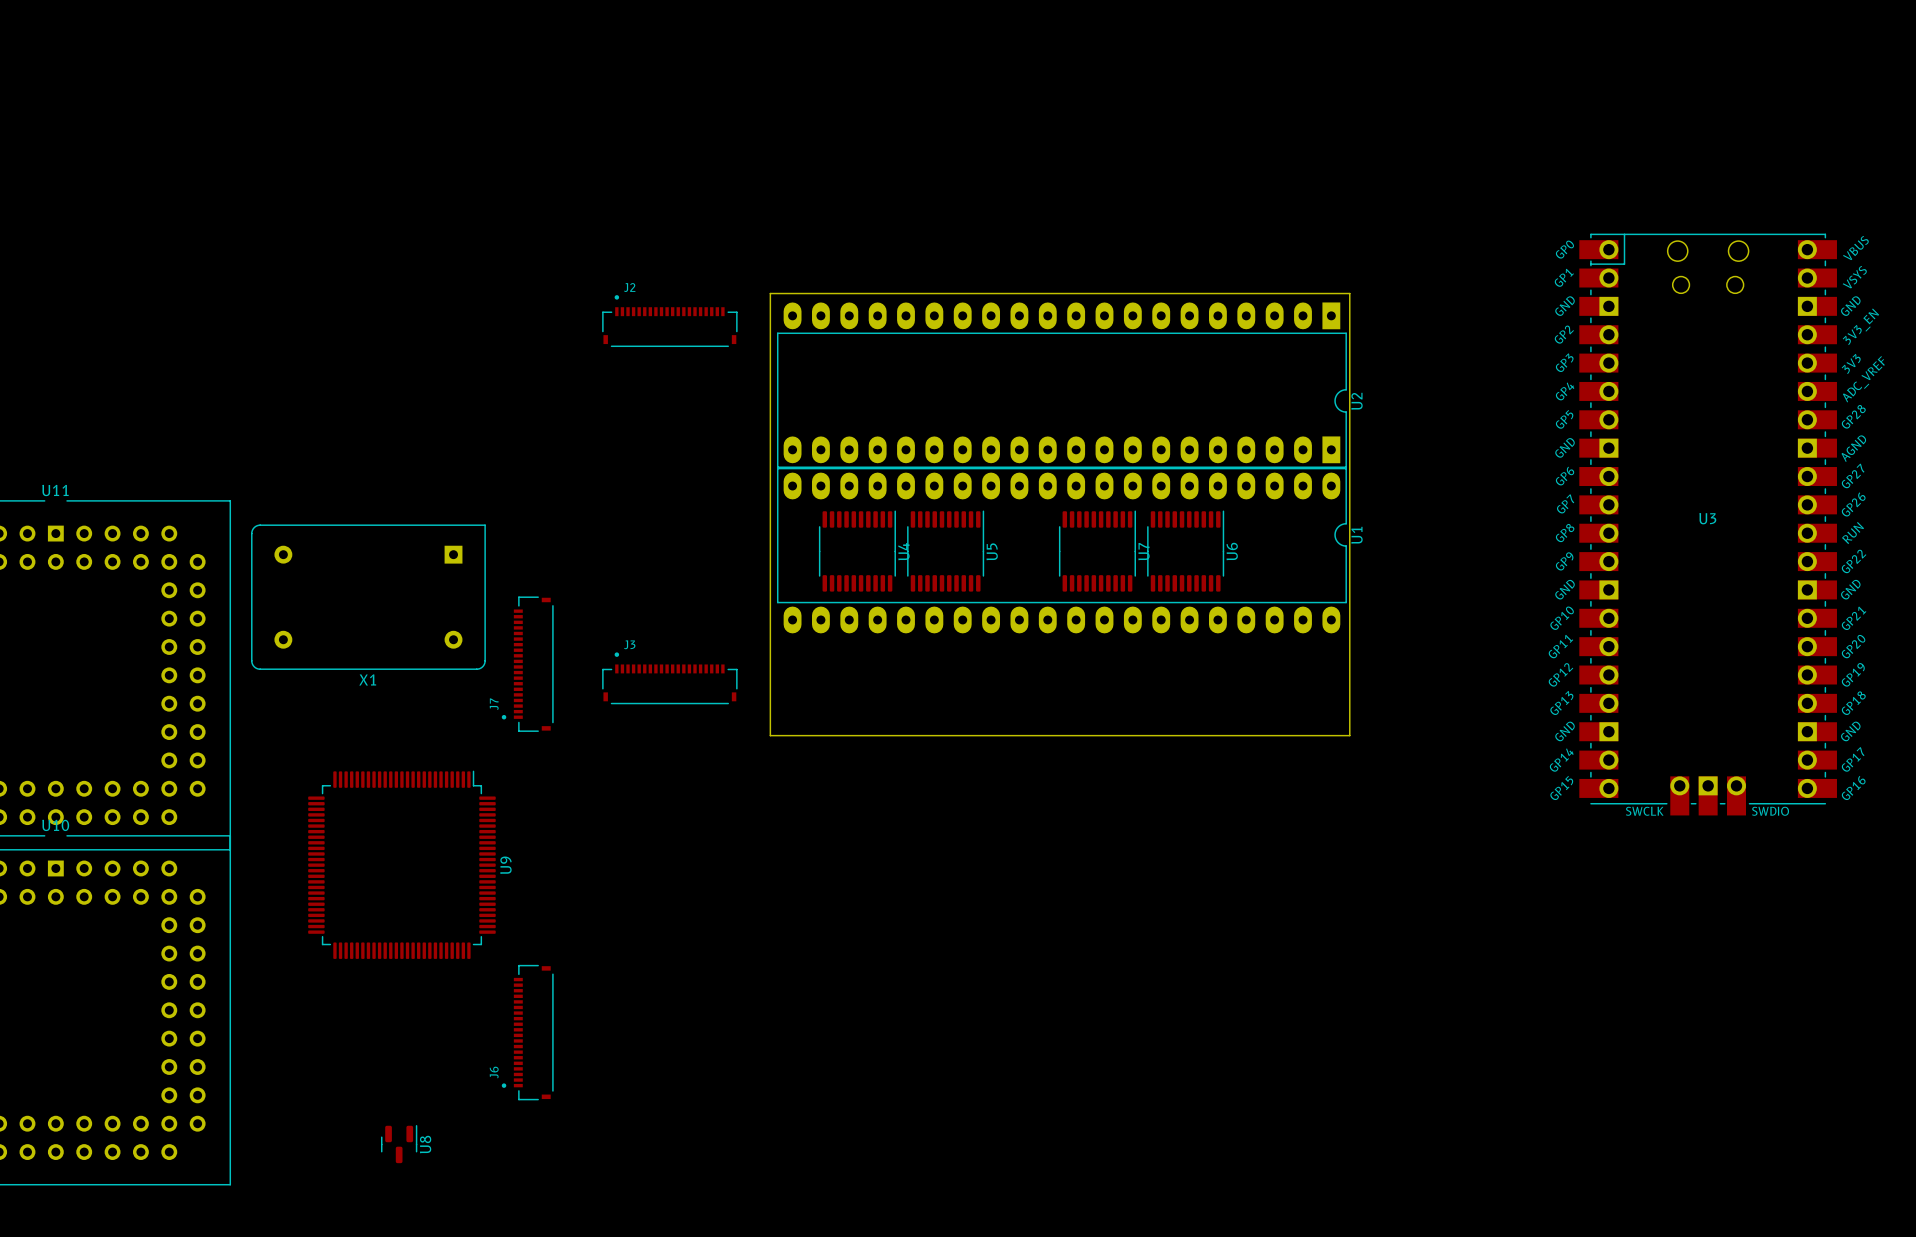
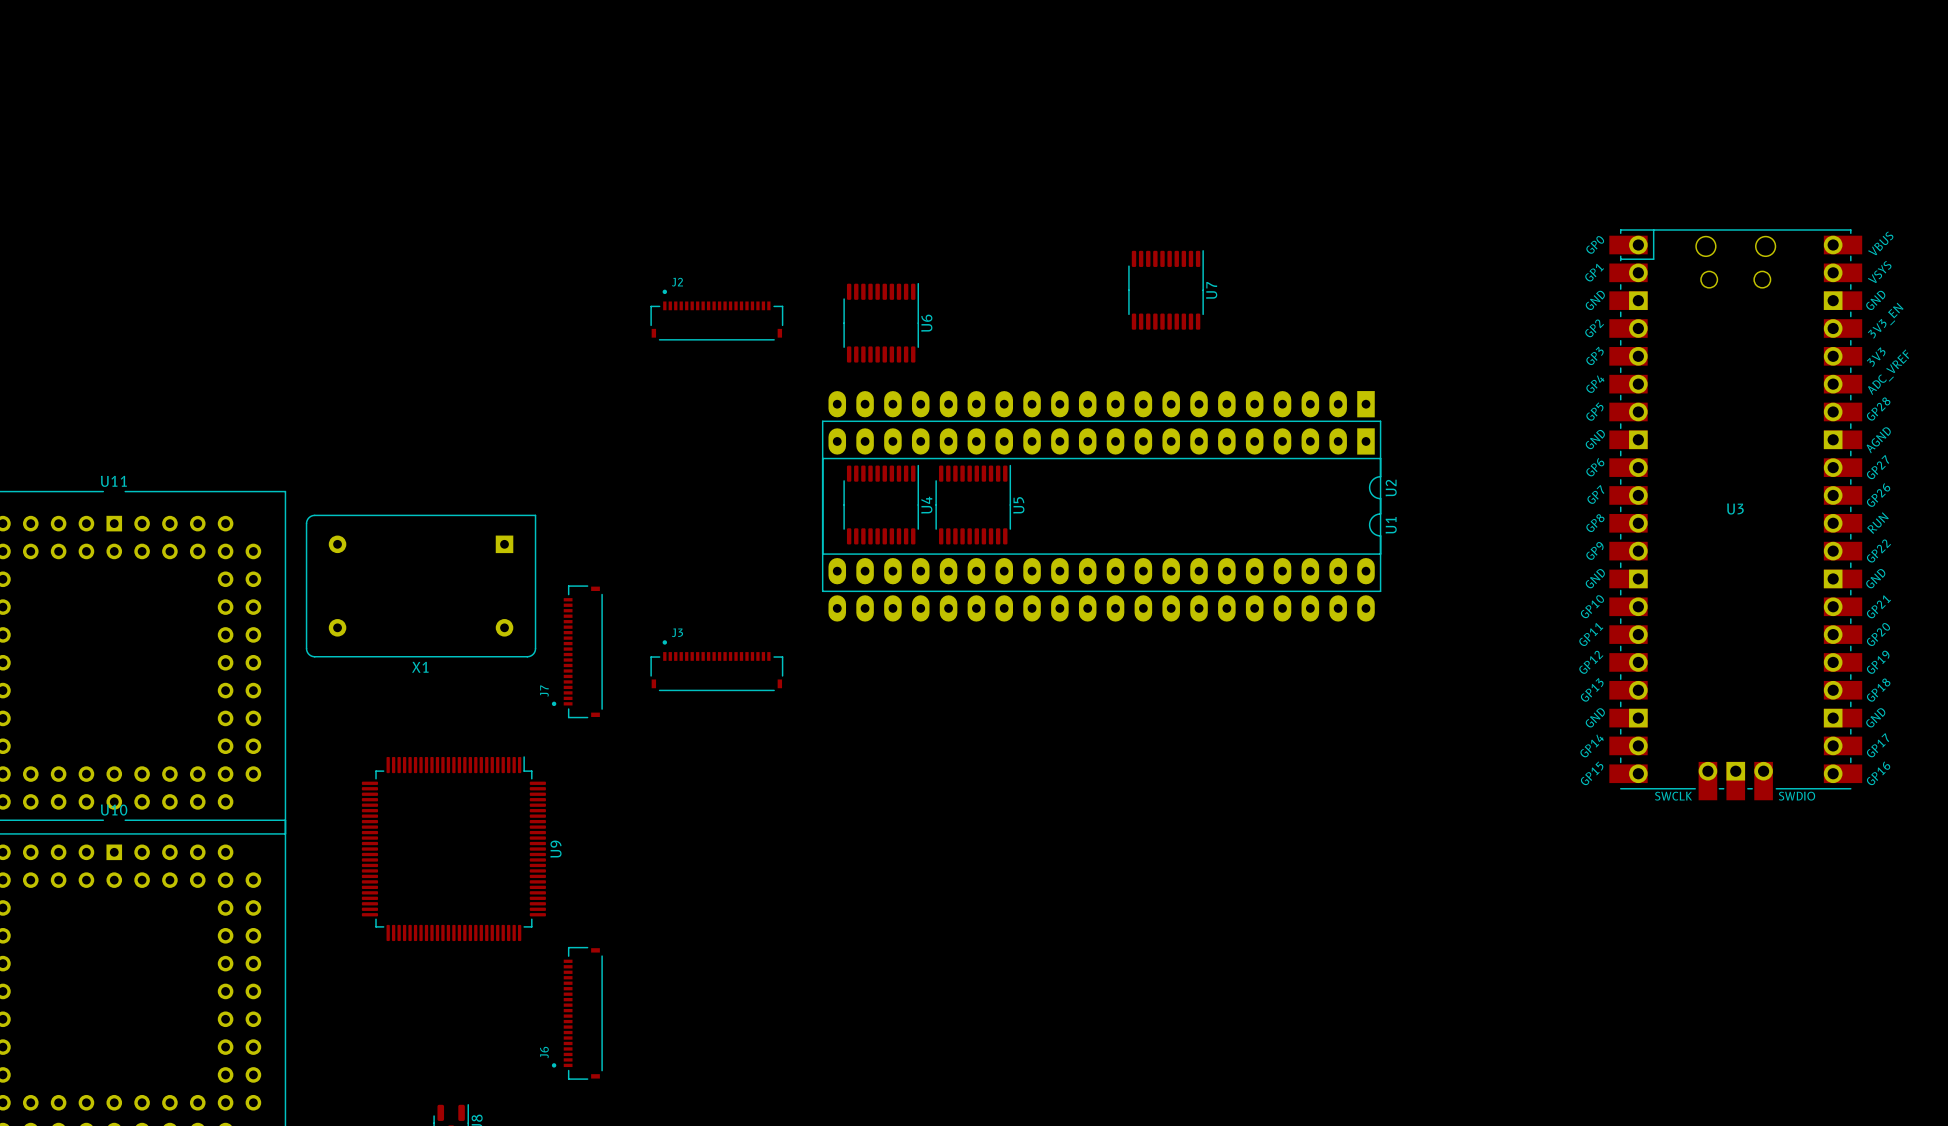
board edge: (770, 293) (1349, 293) (1349, 735) (770, 735) (770, 293) -> none
U2 position: (1061, 400) -> (1101, 487)
U4 position: (857, 551) -> (881, 504)
U5 position: (945, 551) -> (973, 504)
U7 position: (1097, 551) -> (1166, 289)
U6 position: (1185, 551) -> (881, 322)

